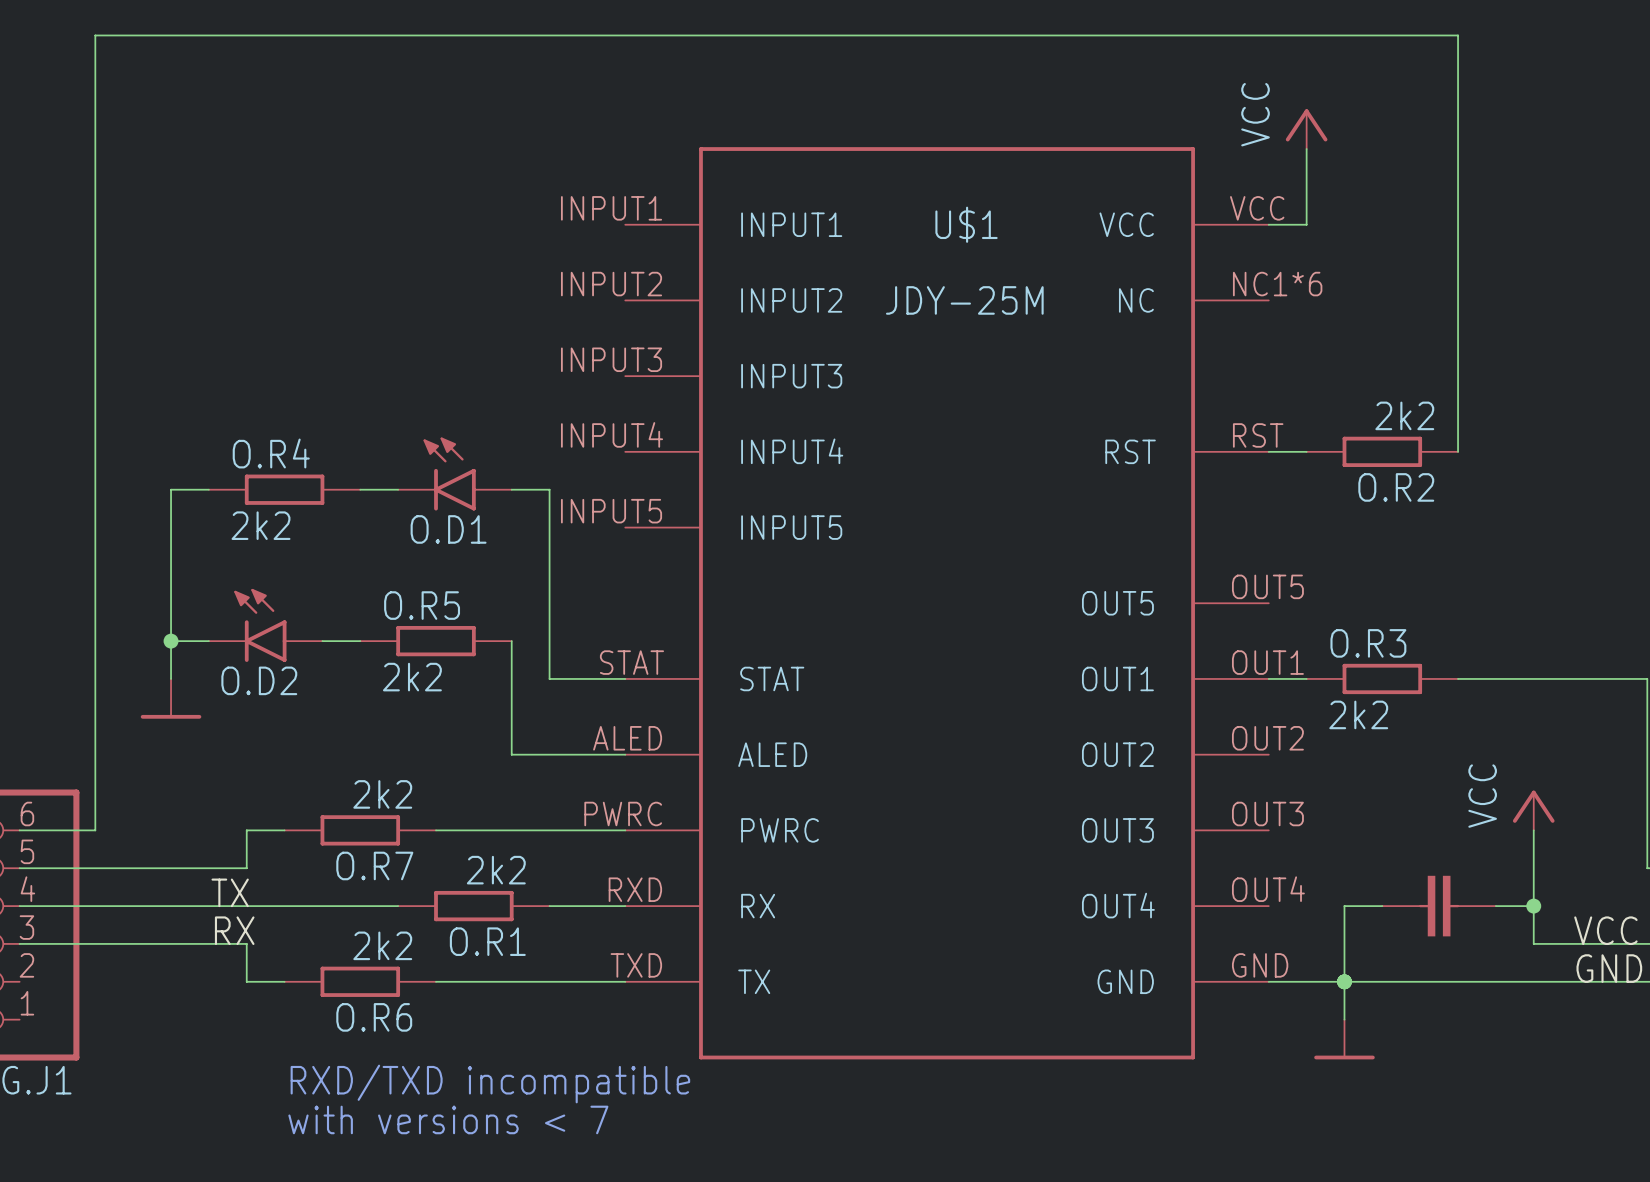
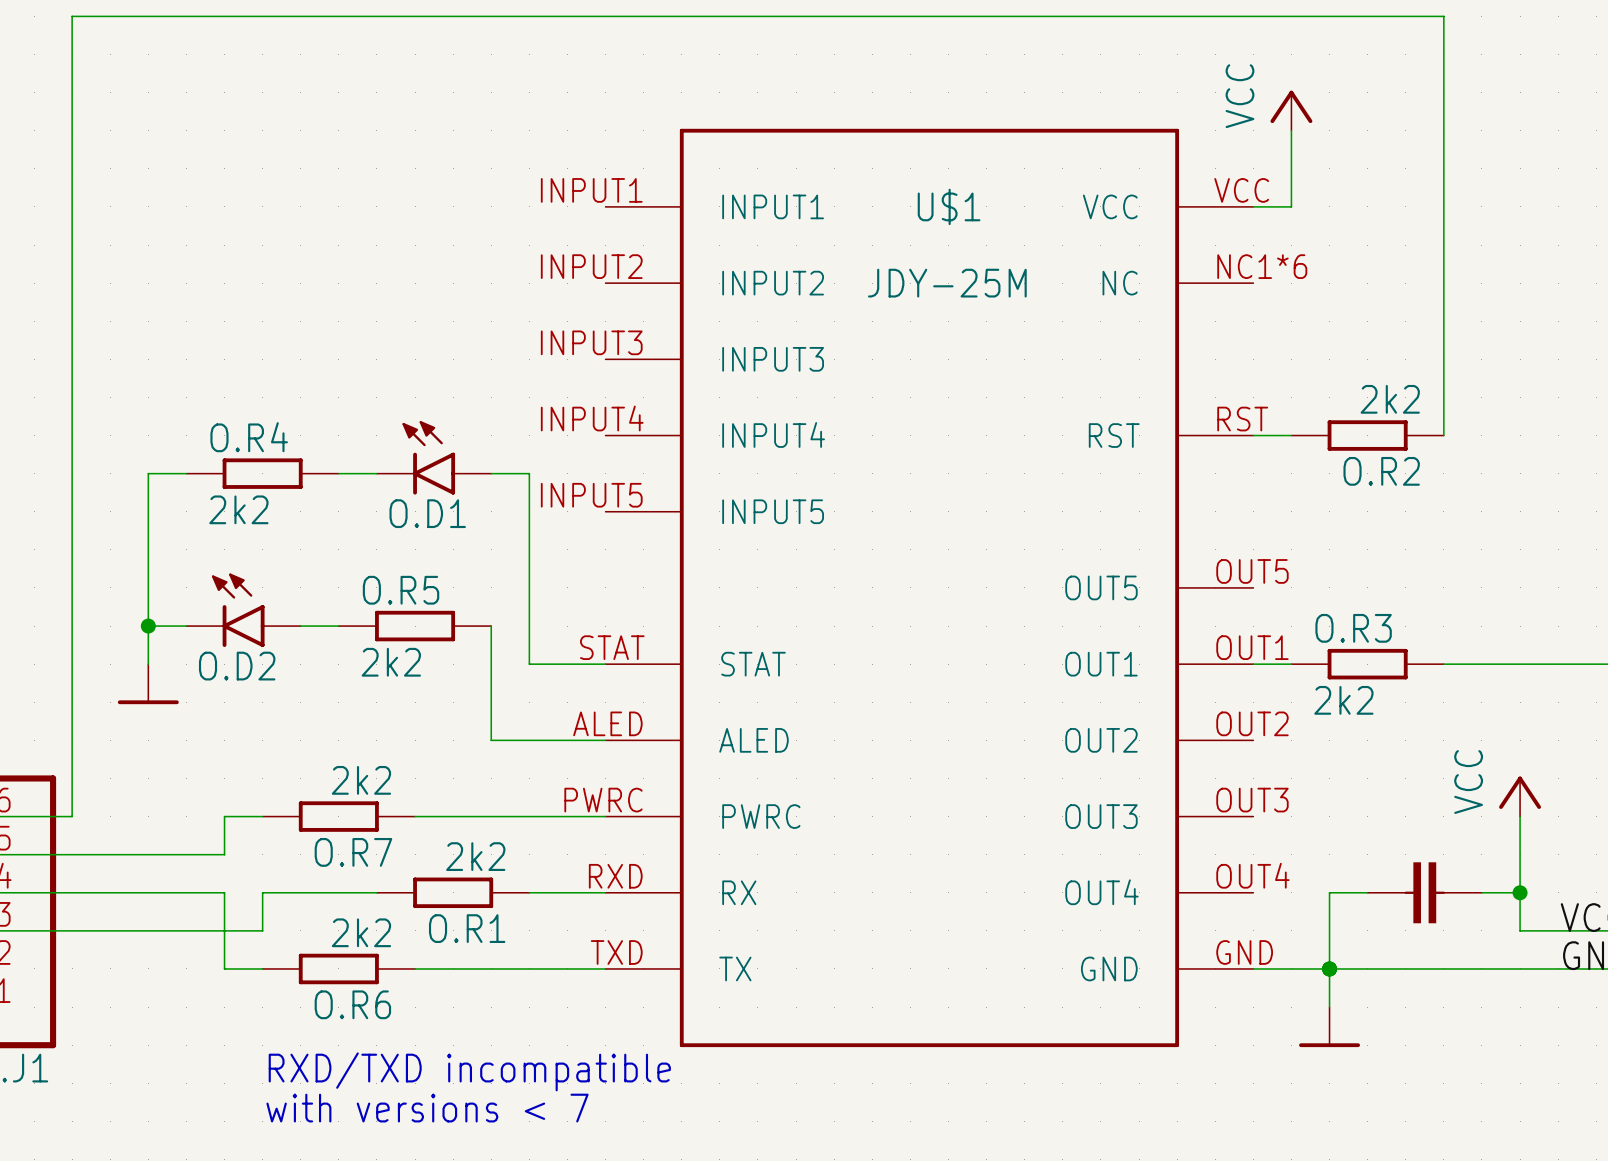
label: TX (230, 892) -> none
wire: (246, 906) (284, 906) -> (224, 892) (224, 930) (262, 930) (262, 892)
label: RX (234, 930) -> none

